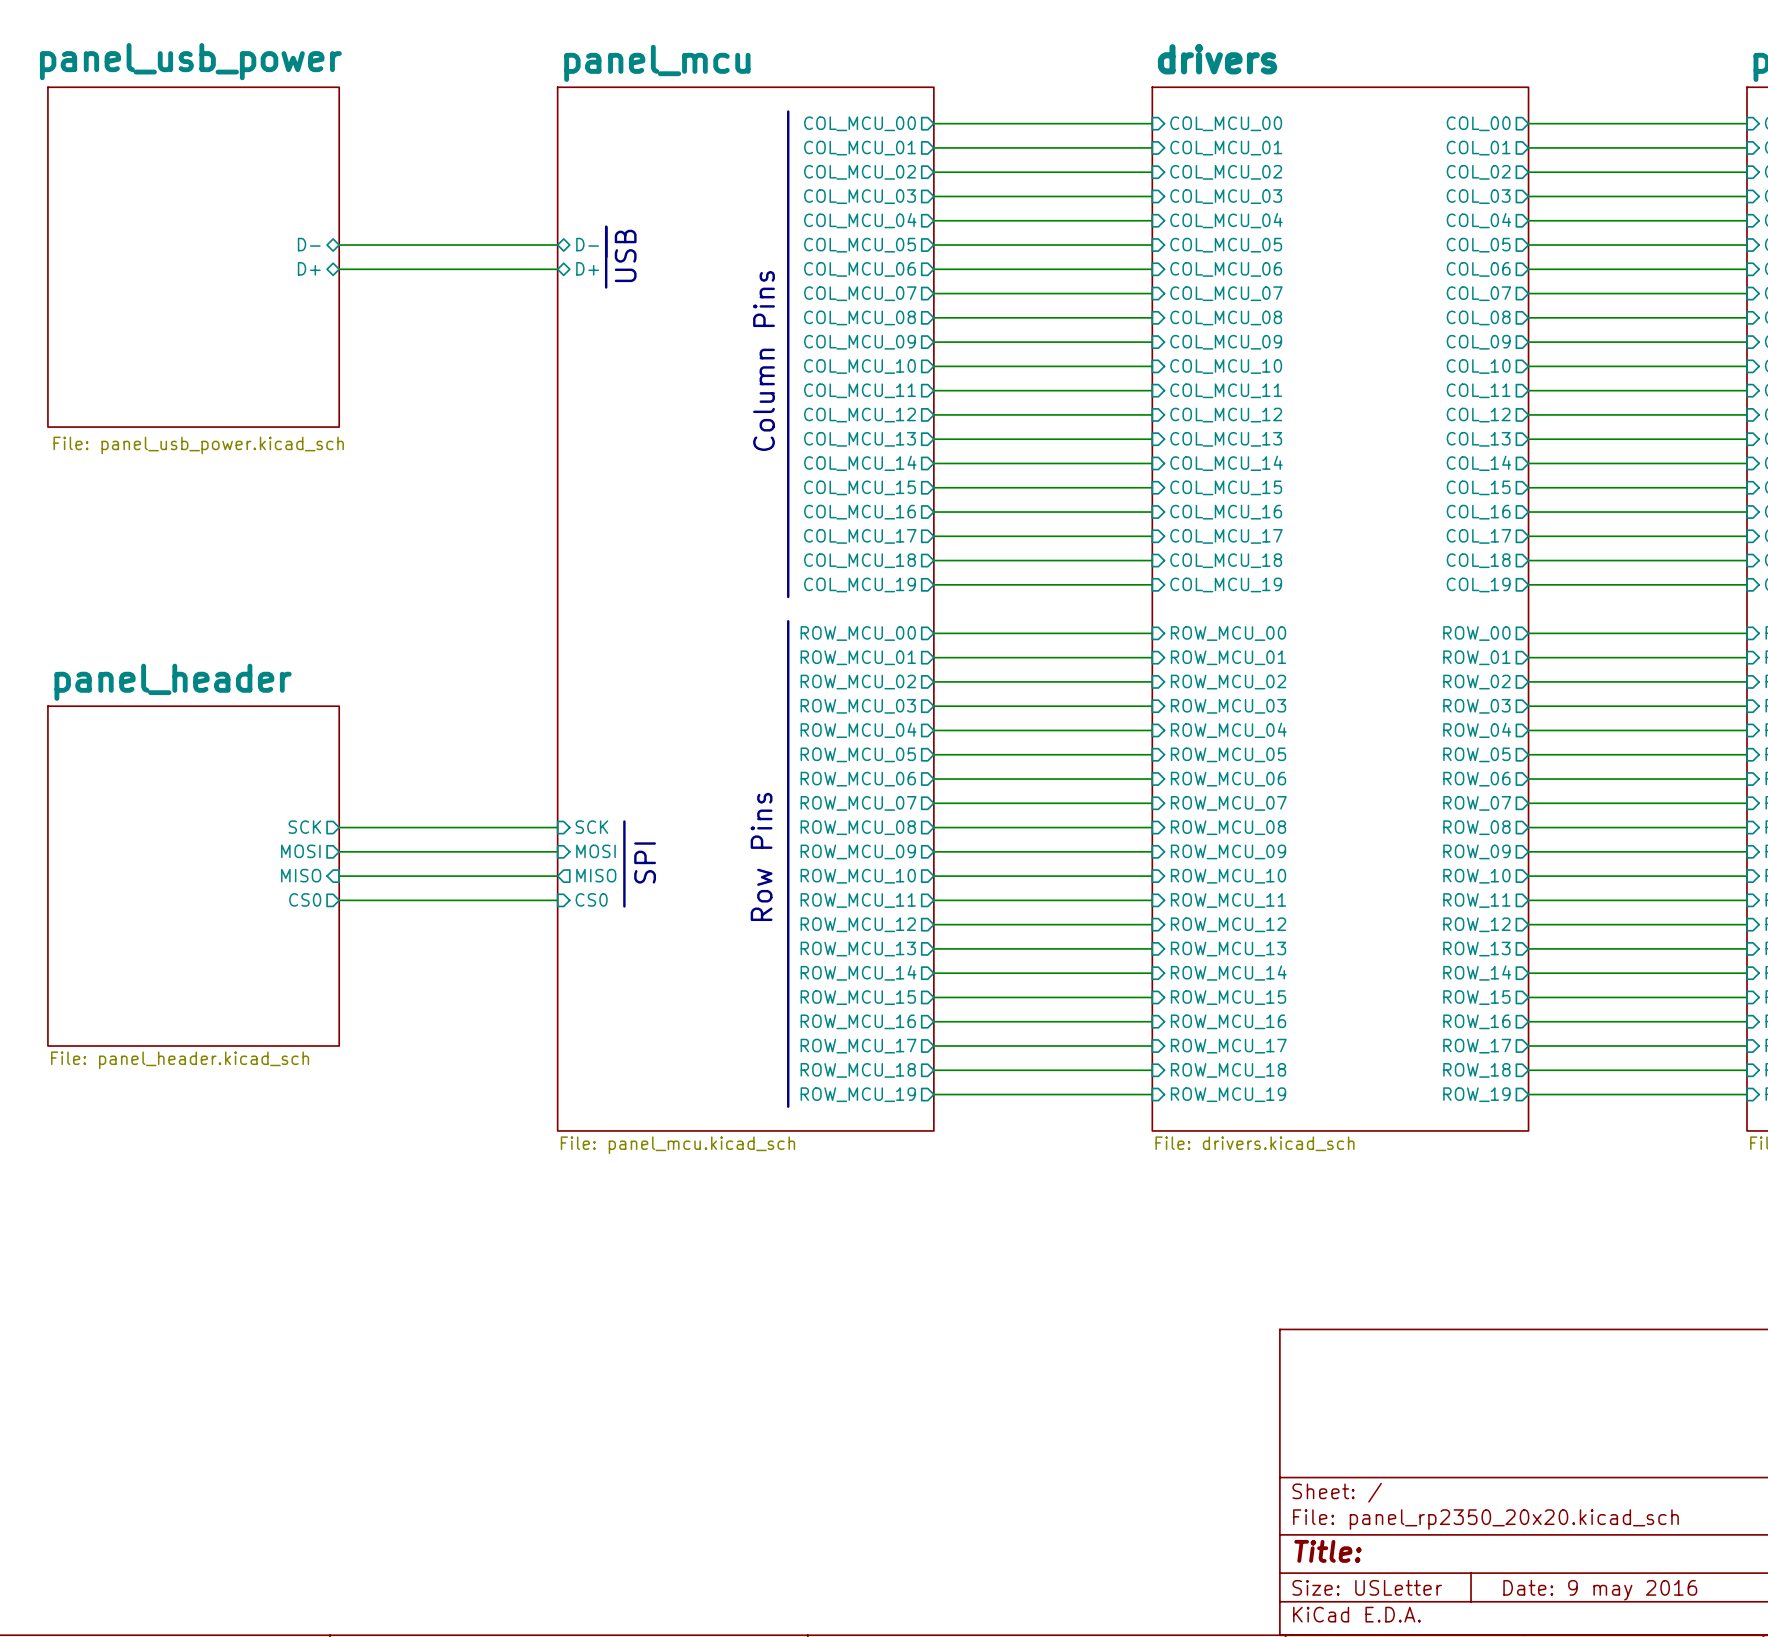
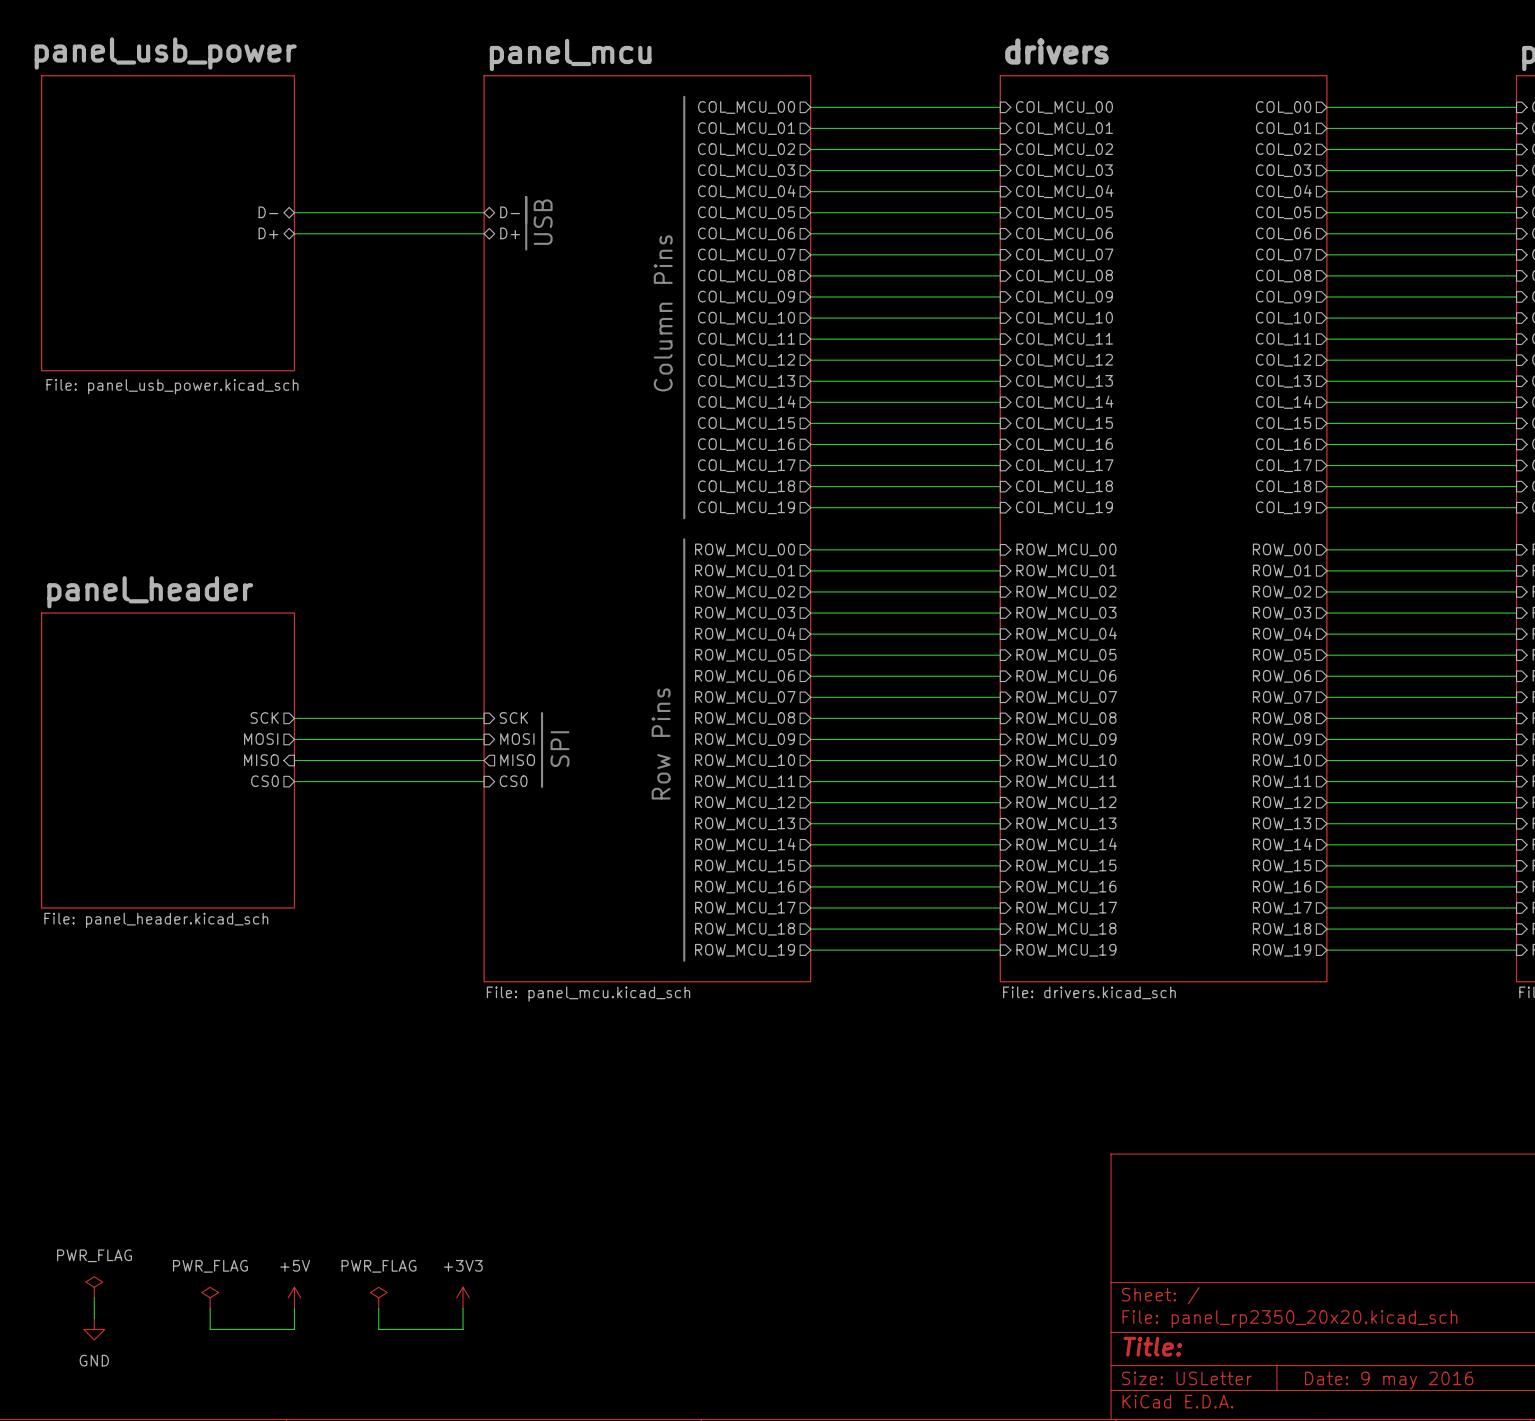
power symbol: none -> PWR_FLAG (94, 1287)
wire: none -> (94, 1297) (94, 1318)
power symbol: none -> PWR_FLAG (210, 1297)
power symbol: none -> +5V (294, 1297)
power symbol: none -> PWR_FLAG (378, 1297)
power symbol: none -> +3V3 (463, 1297)
wire: none -> (210, 1308) (210, 1329) (294, 1329) (294, 1308)
wire: none -> (378, 1308) (378, 1329) (463, 1329) (463, 1308)
power symbol: none -> GND (94, 1329)

